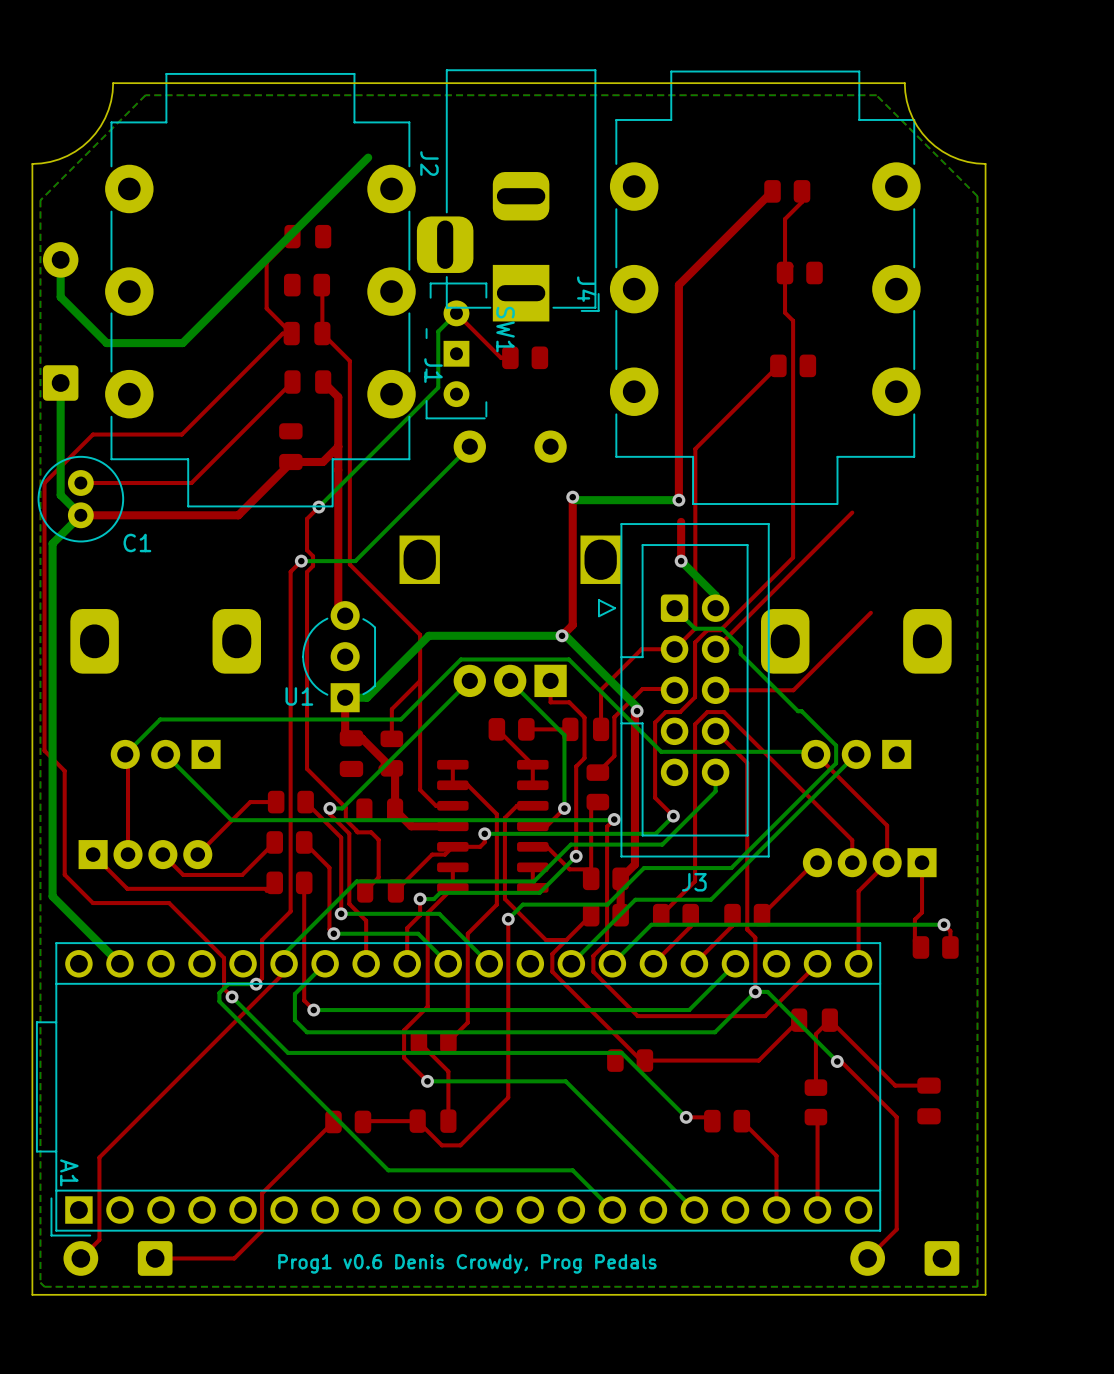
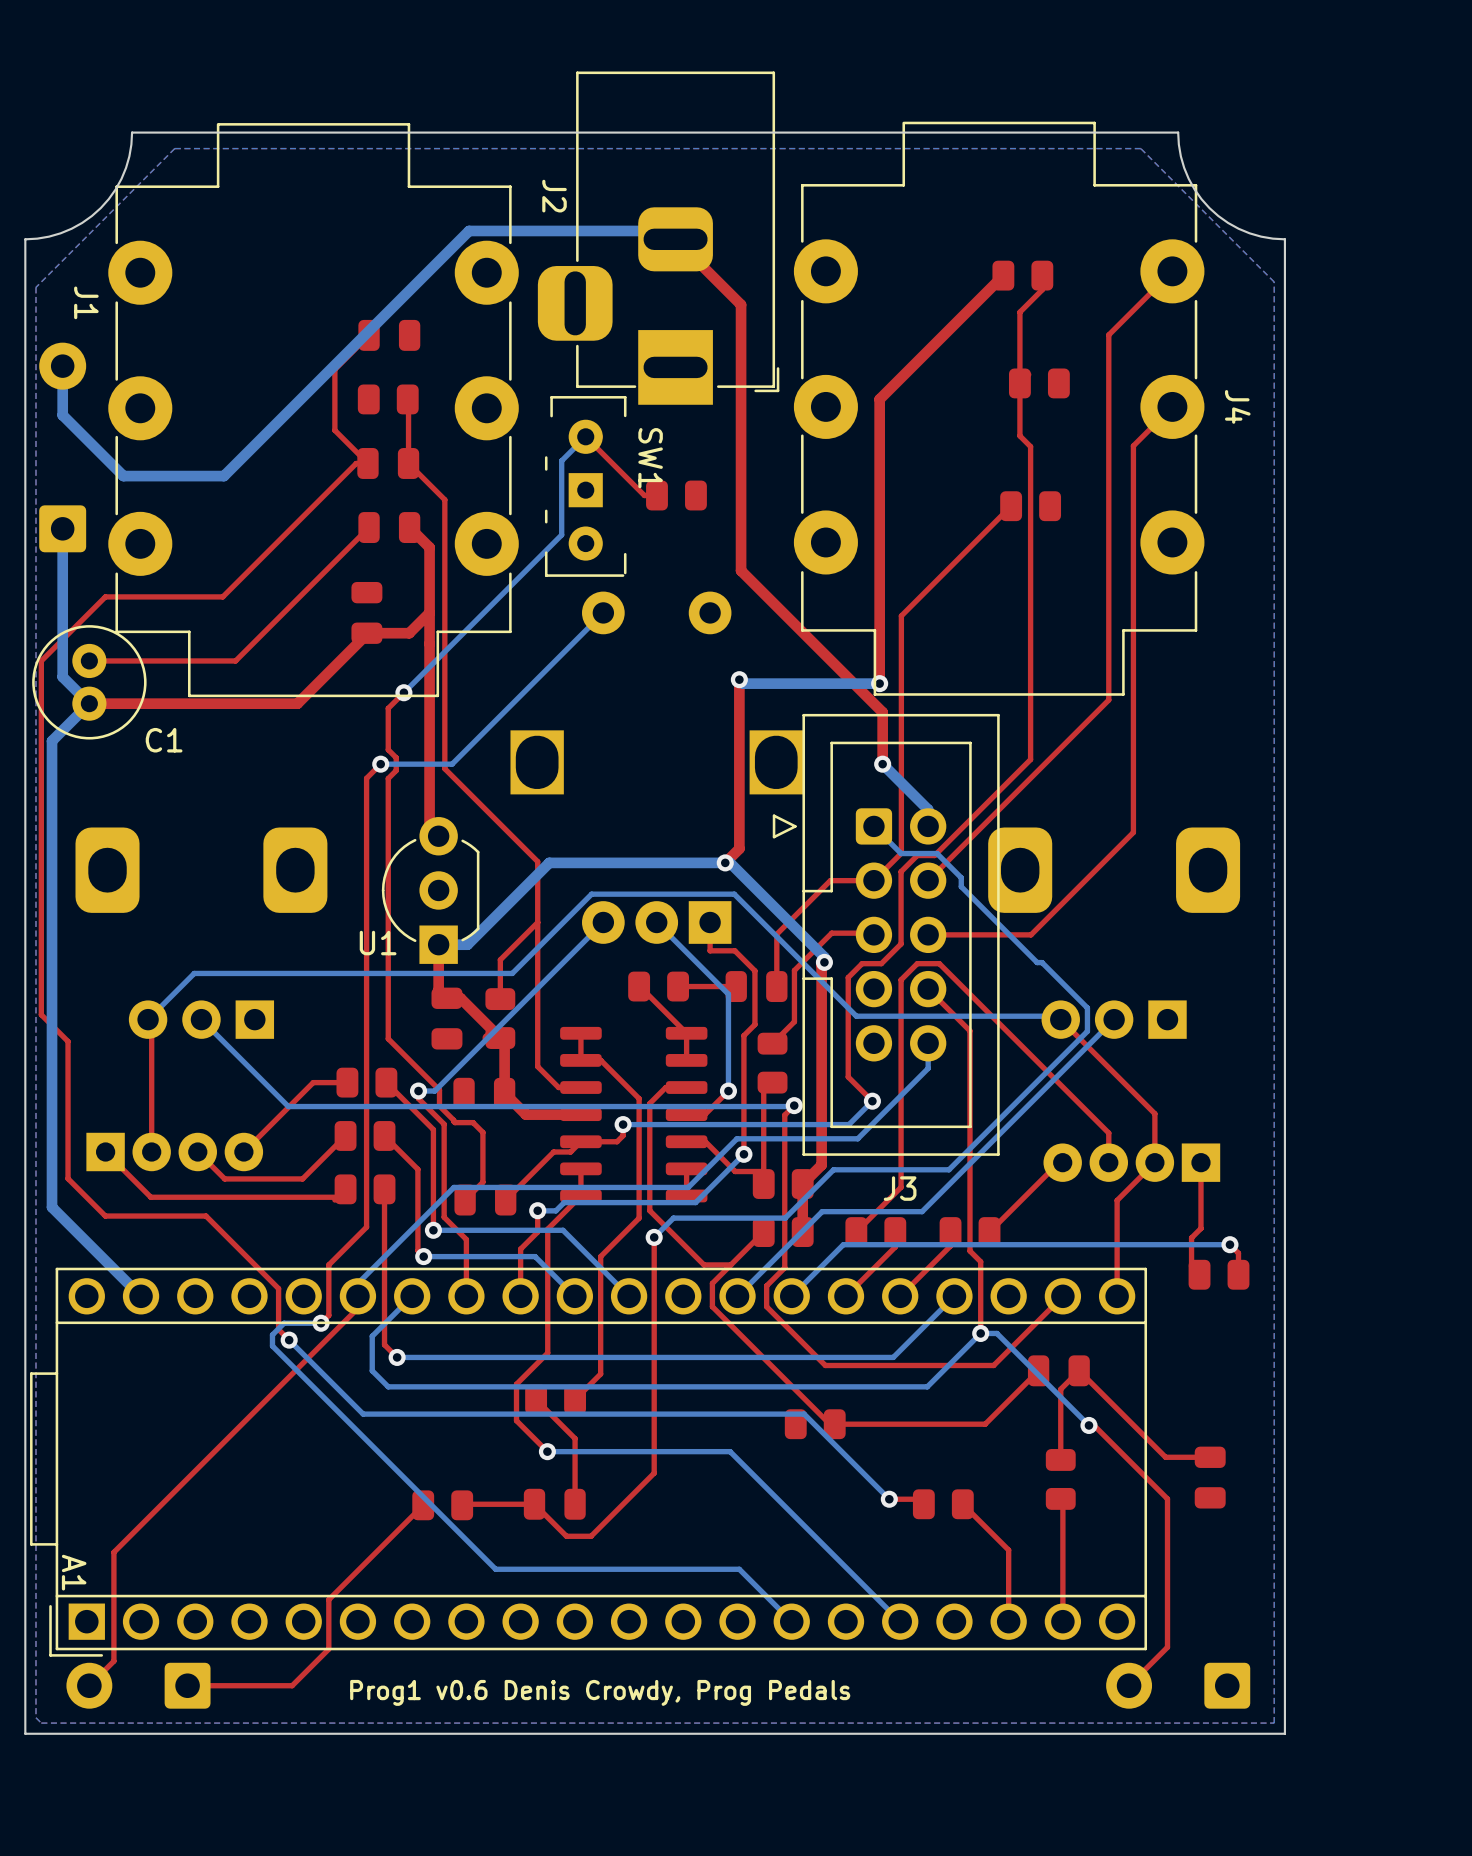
bottom track: none -> (469, 230) (667, 230) (675, 239)
top track: none -> (675, 239) (741, 304) (741, 570) (882, 712)
top track: none -> (1172, 271) (1108, 334) (1108, 700)
J2 position: (508, 195) -> (658, 238)
J4 rotation: 0° (765, 287) -> 180° (999, 408)
J1 rotation: 0° (260, 290) -> 180° (313, 410)
top track: none -> (1172, 406) (1133, 445) (1133, 832)

